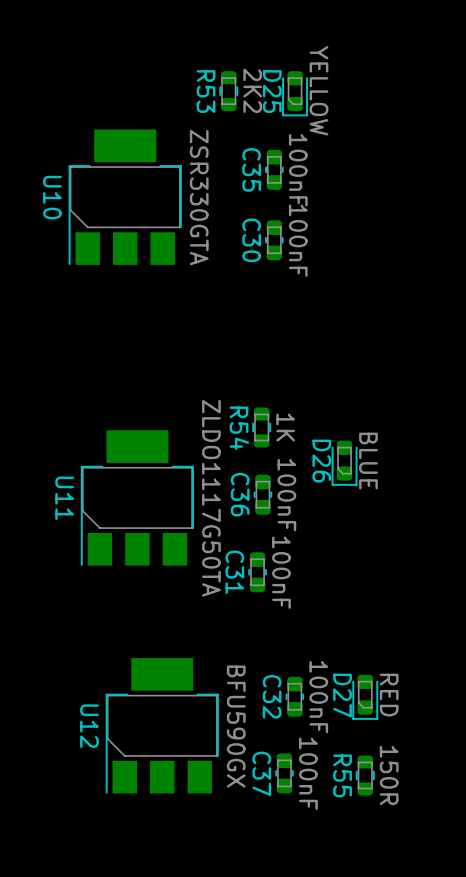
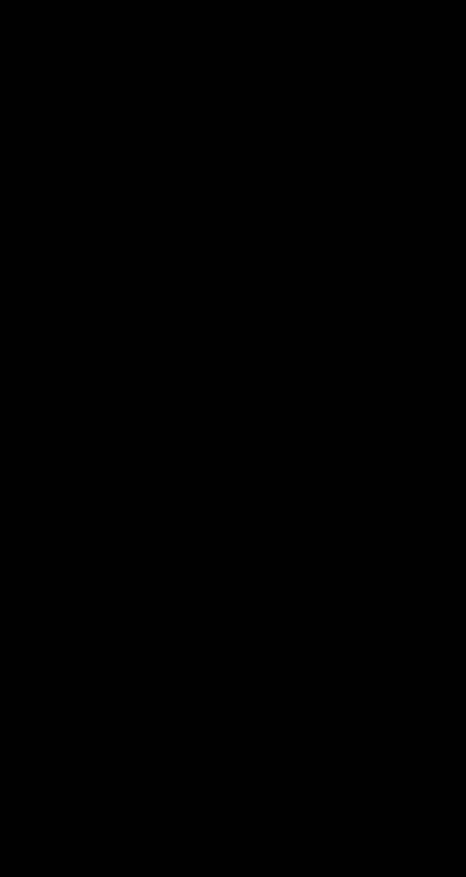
R53: 2K2 (228, 91) -> none
D25: YELLOW (295, 93) -> none
C35: 100nF (274, 169) -> none
U10: ZSR330GTA (125, 197) -> none
C30: 100nF (274, 240) -> none
R54: 1K (261, 427) -> none
D26: BLUE (344, 463) -> none
C36: 100nF (262, 494) -> none
U11: ZLDO1117G50TA (137, 498) -> none
C31: 100nF (257, 572) -> none
C32: 100nF (294, 696) -> none
D27: RED (365, 697) -> none
U12: BFU590GX (162, 725) -> none
C37: 100nF (284, 773) -> none
R55: 150R (365, 775) -> none

